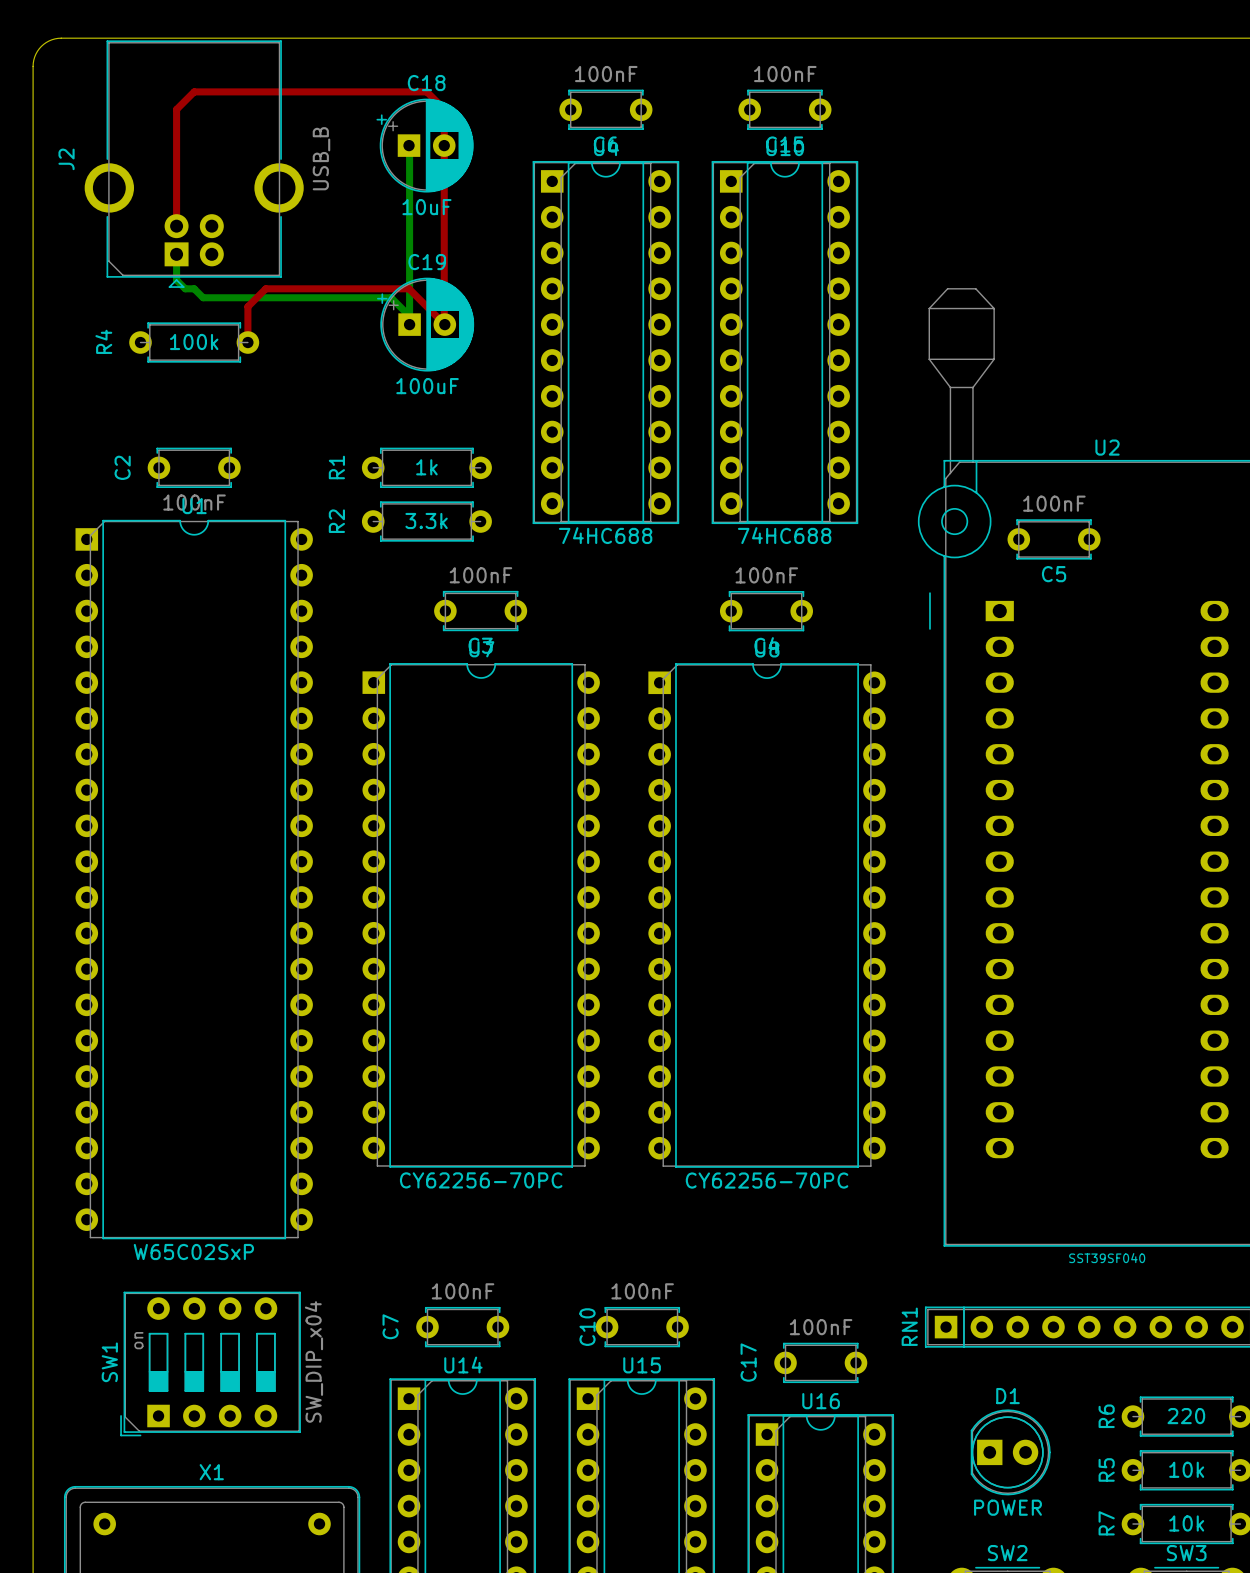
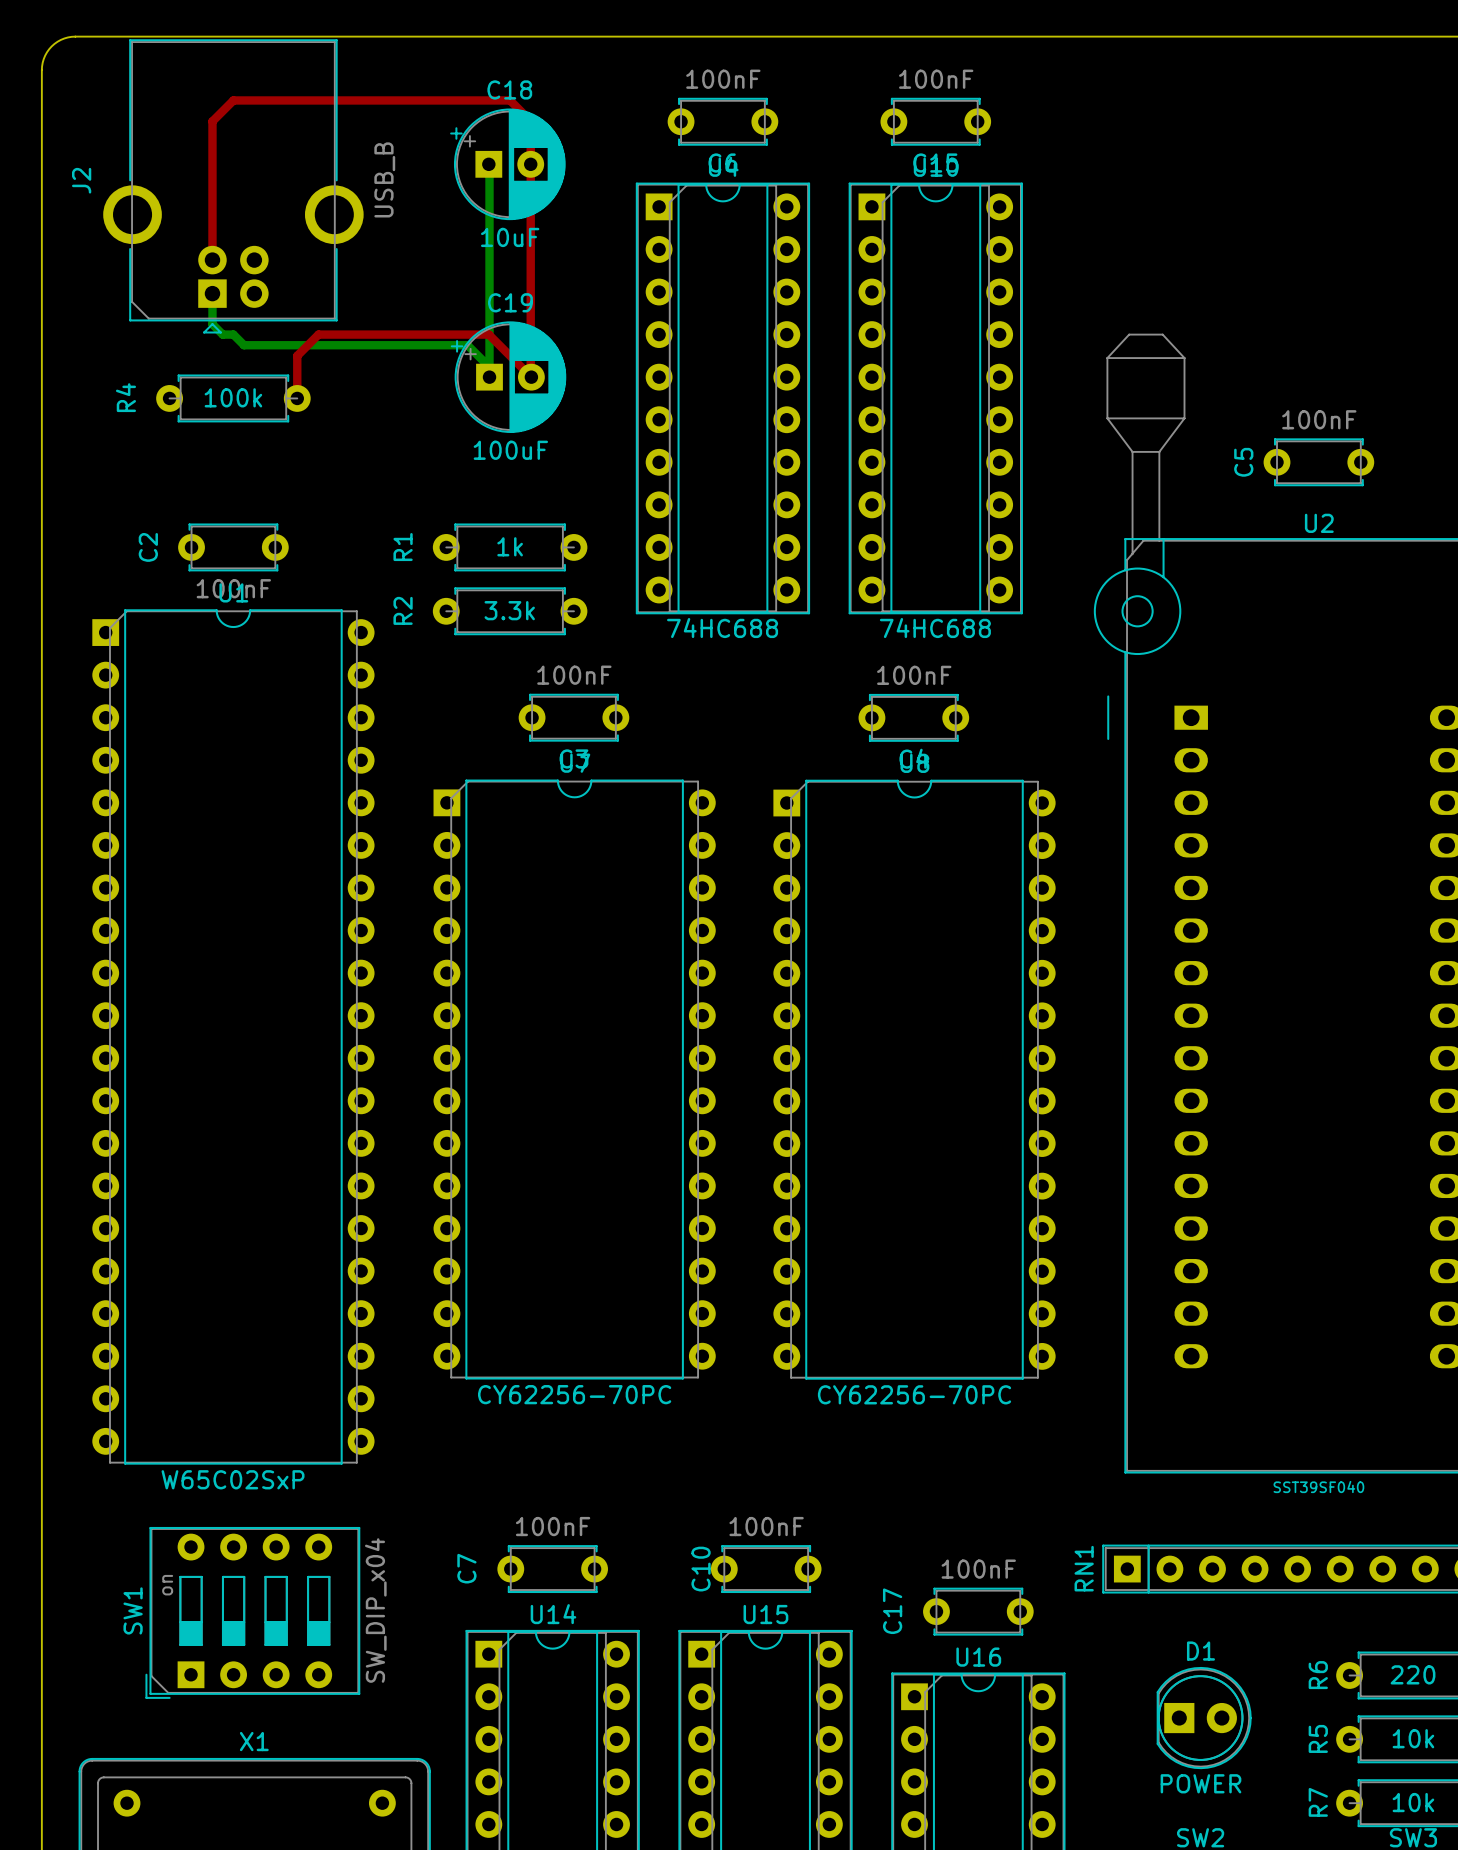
C5 position: (1054, 539) -> (1318, 462)
C5 name rotation: 0° (1054, 574) -> 90° counterclockwise (1243, 462)
C5 name position: C5 (1054, 574) -> C5 (1243, 462)

